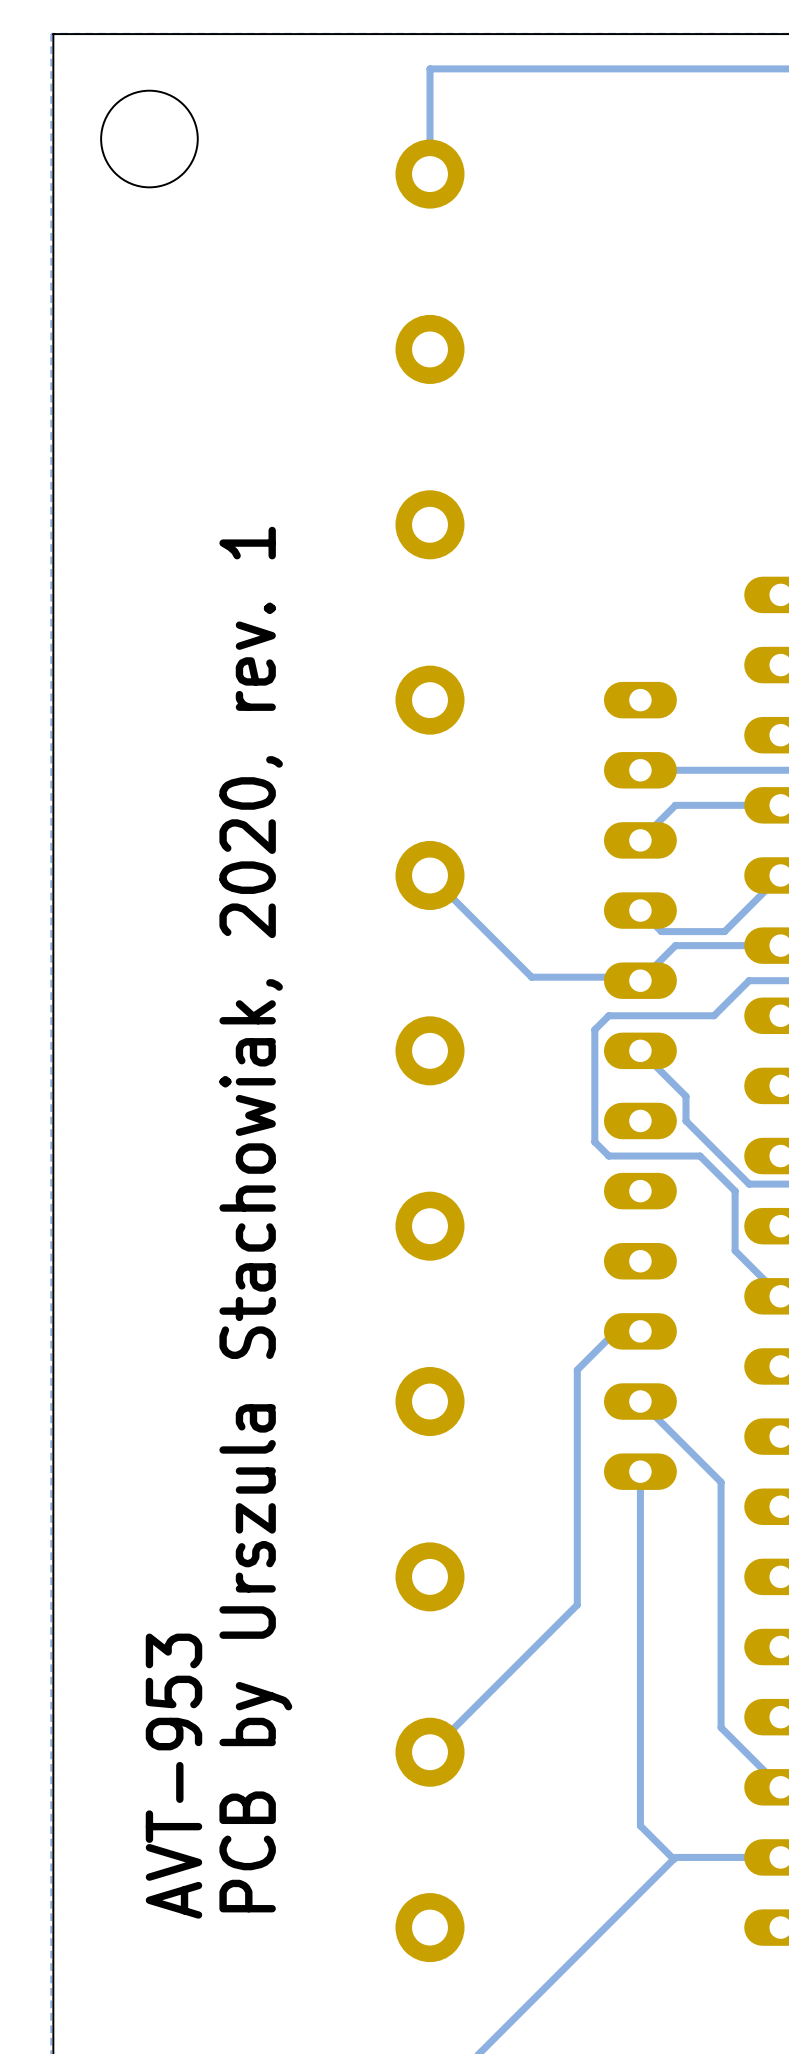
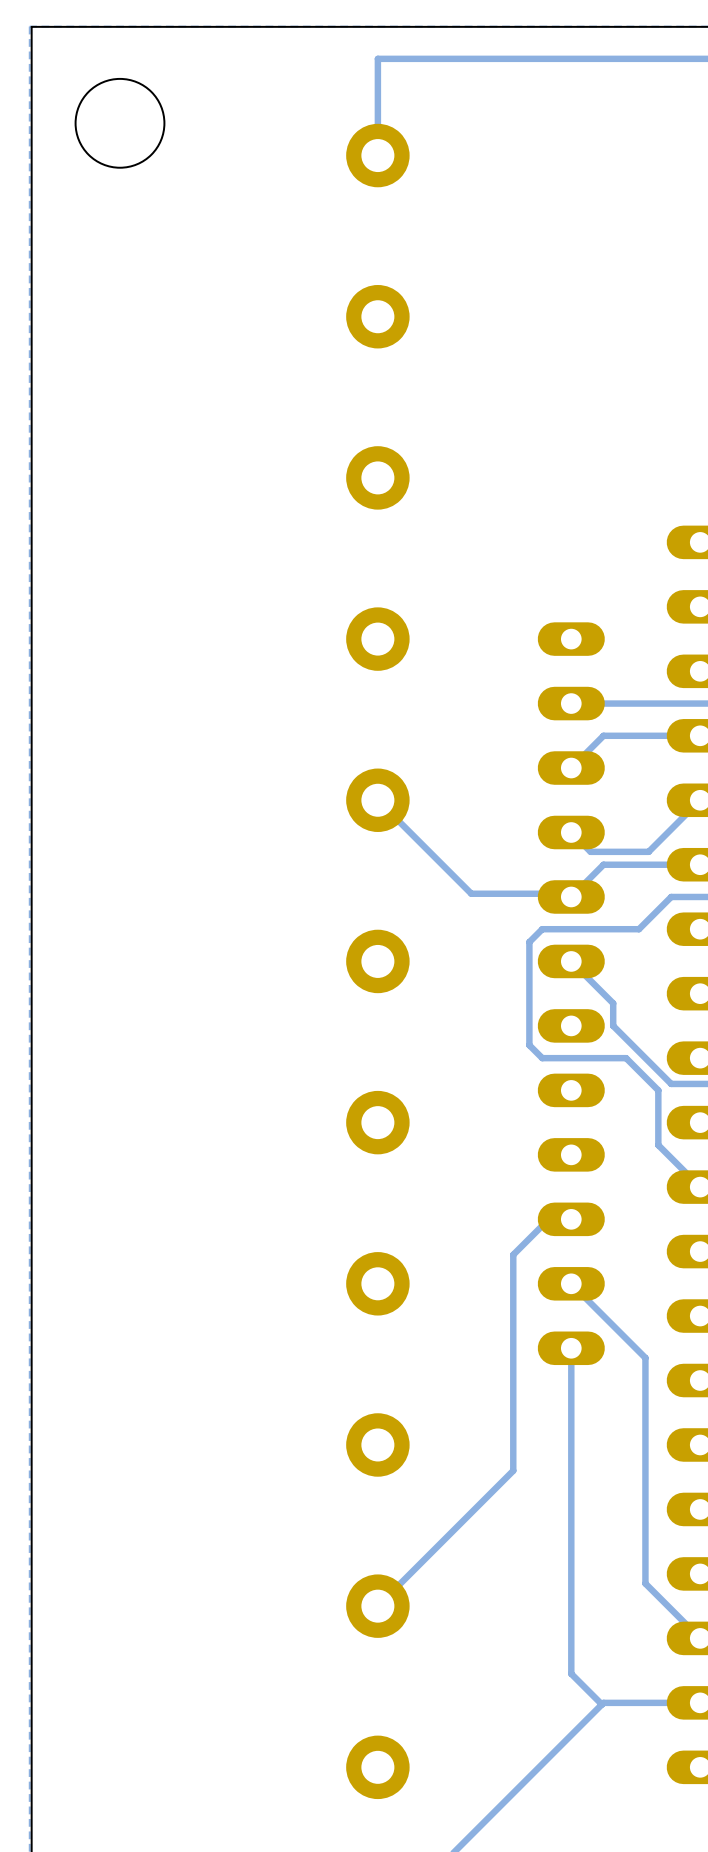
text: PCB by Urszula Stachowiak, 2020, rev. 1 (255, 1219) -> none
text: AVT-953 (173, 1776) -> none

